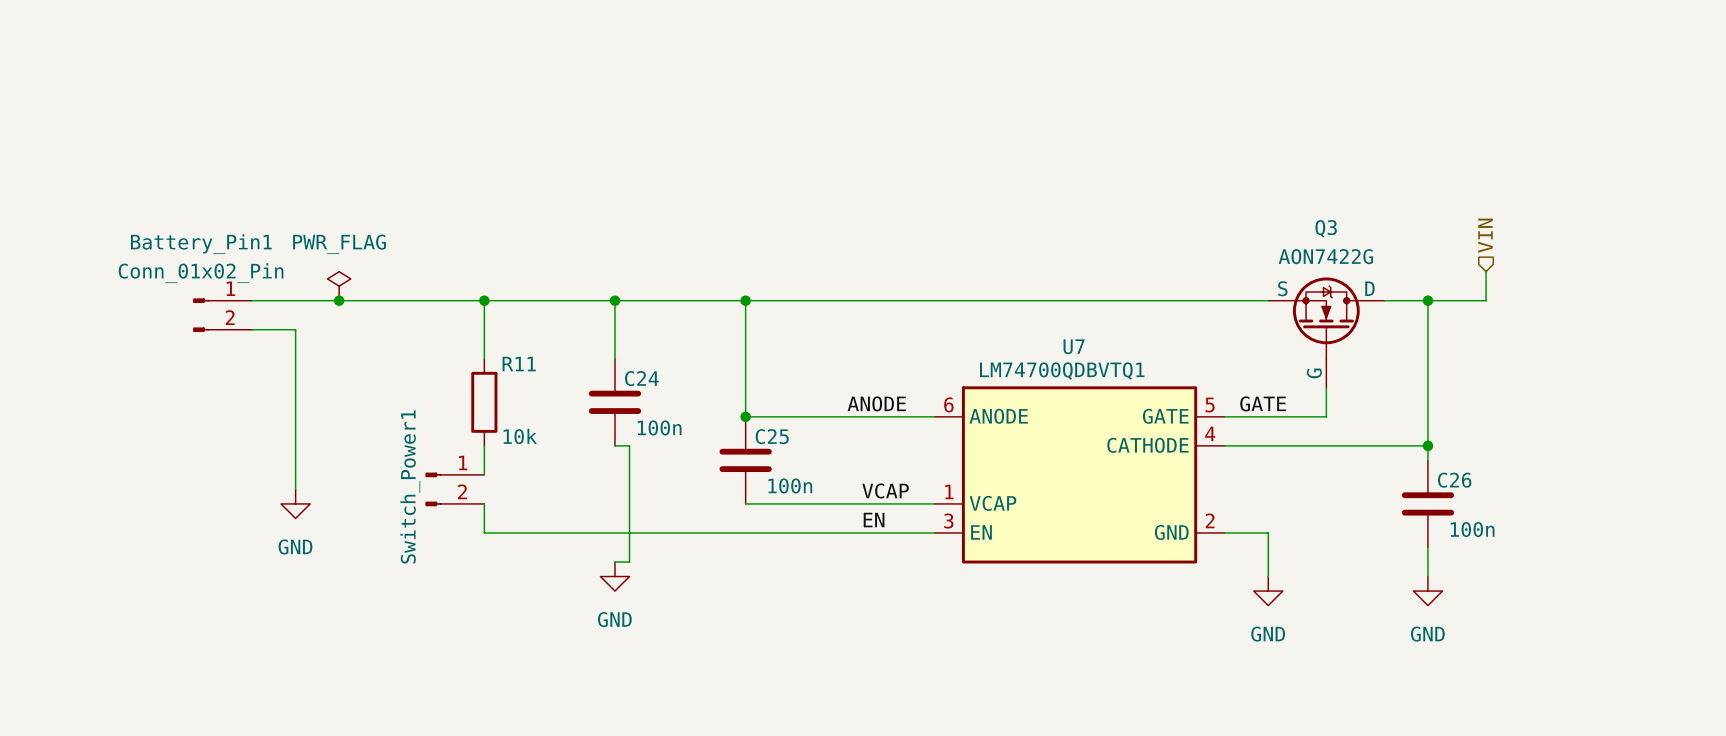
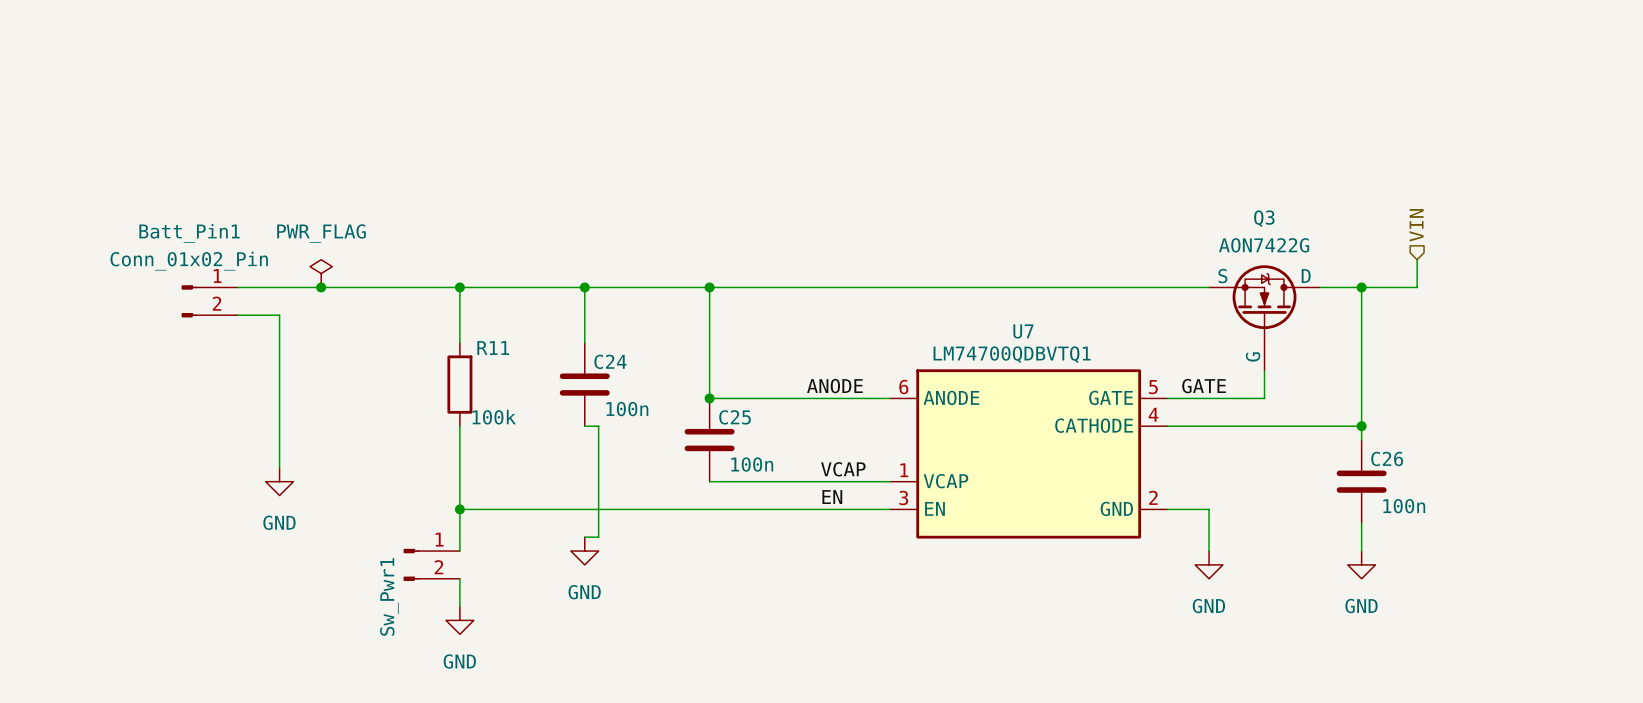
Battery_Pin1 name: Battery_Pin1 (201, 244) -> Batt_Pin1 (189, 233)
R11 value: 10k (520, 436) -> 100k (494, 417)
wire: none -> (459, 453) (459, 481)
Switch_Power1: (454, 489) -> none
wire: none -> (459, 509) (459, 551)
junction: none -> (459, 509)
Sw_Pwr1: none -> (431, 564)
wire: none -> (459, 578) (459, 606)
power symbol: none -> GND (459, 620)

